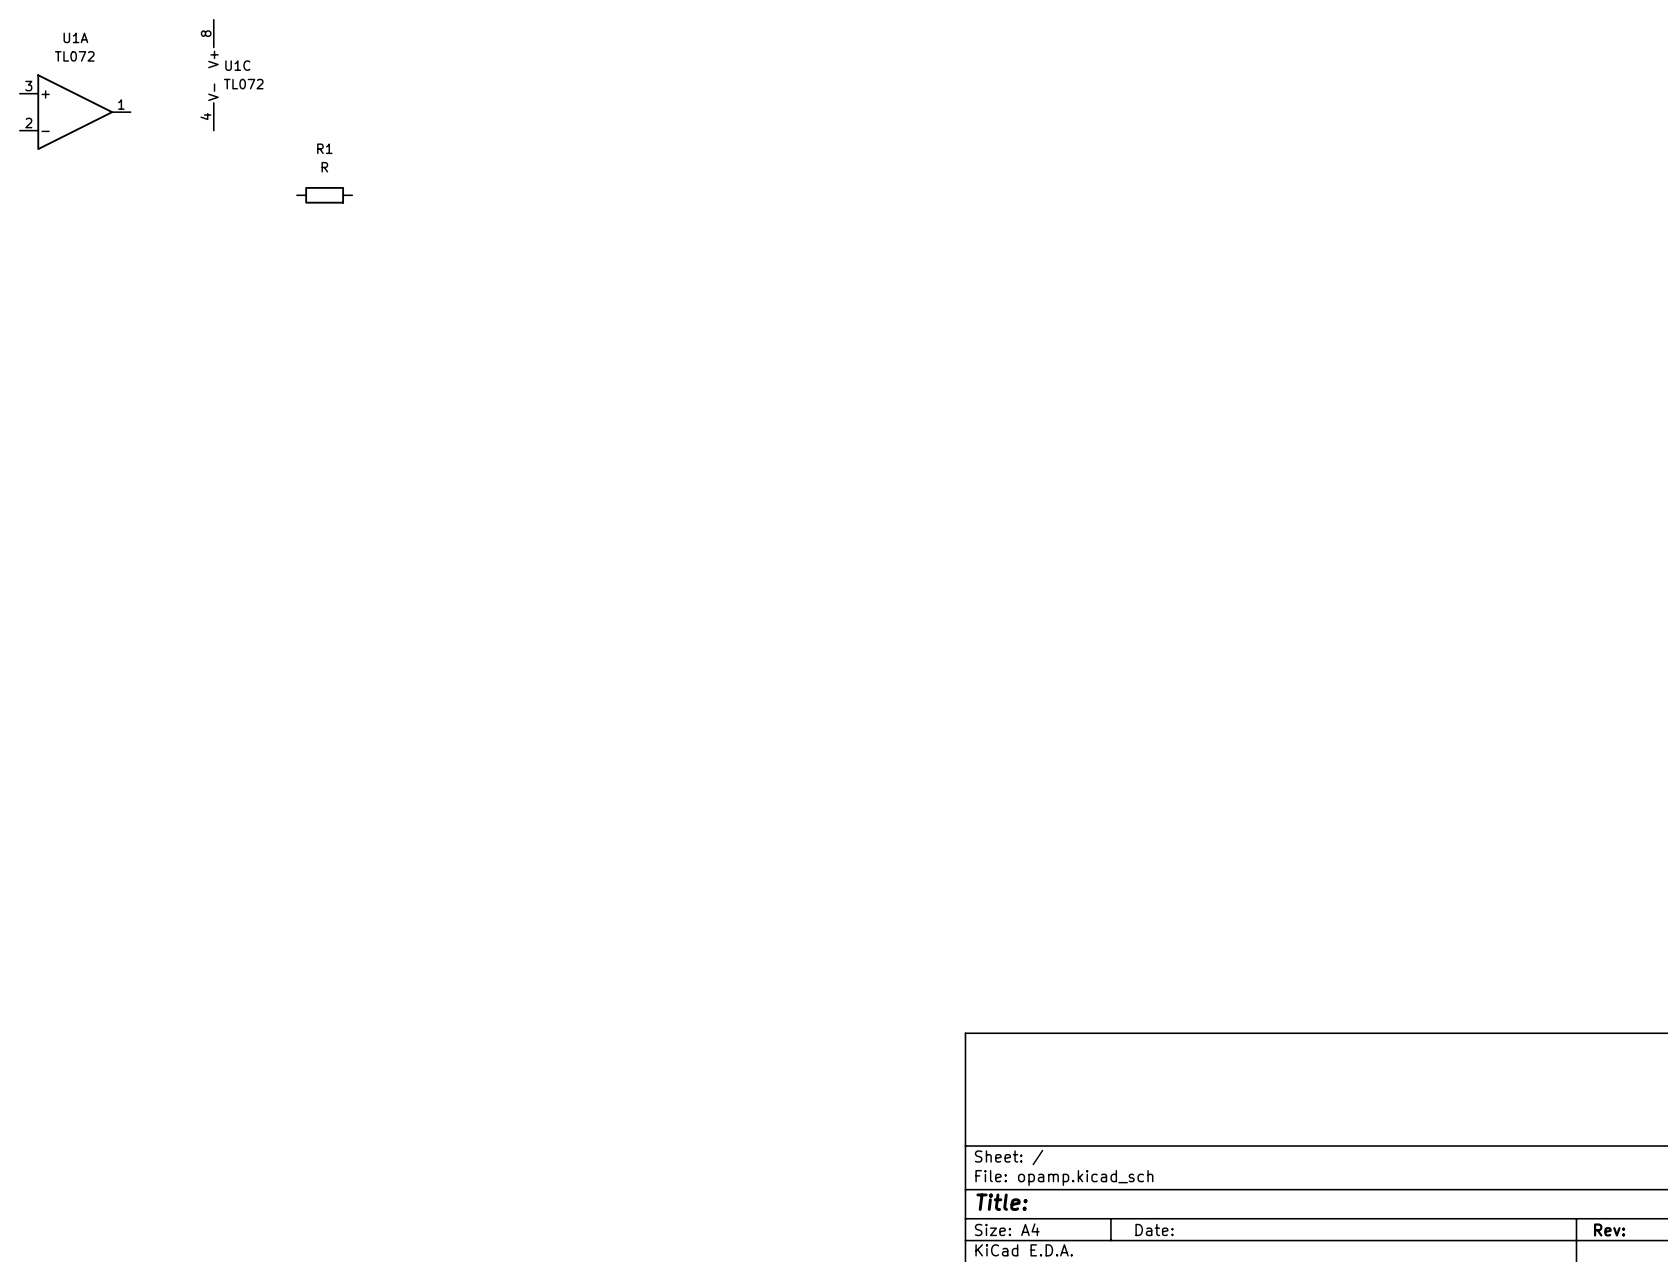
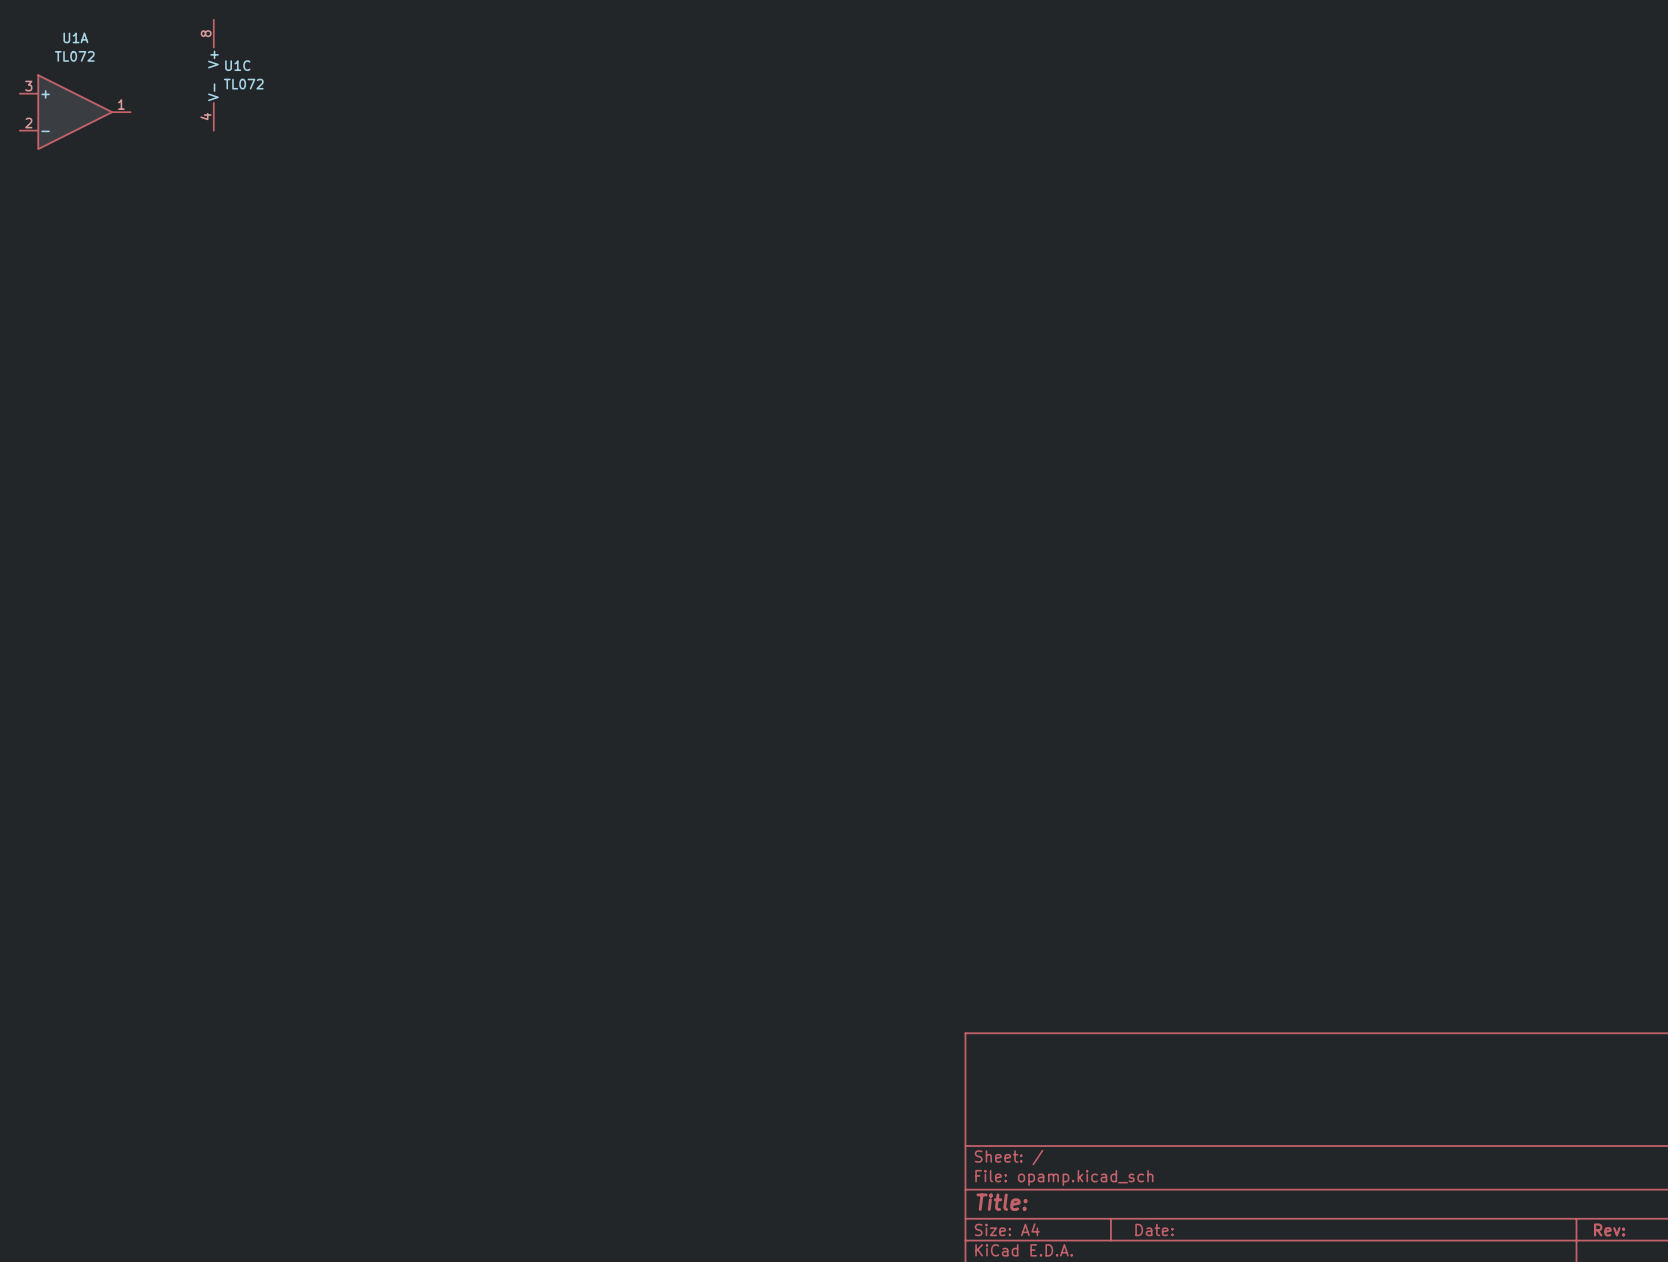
R1: R (324, 195) -> none

